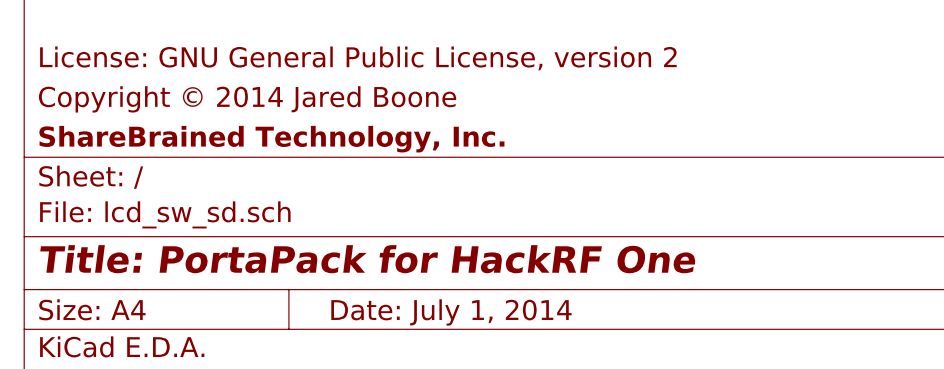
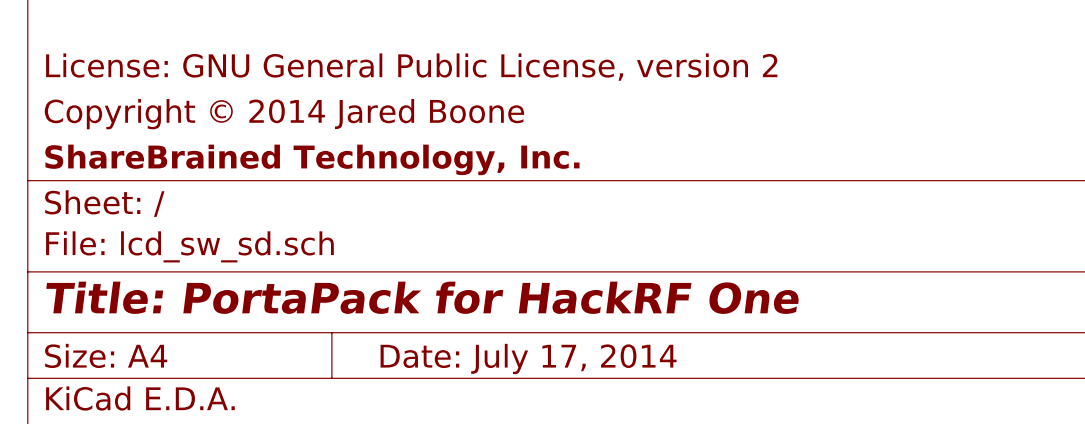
title block: Date: July 1, 2014 (451, 312) -> Date: July 17, 2014 (528, 358)

